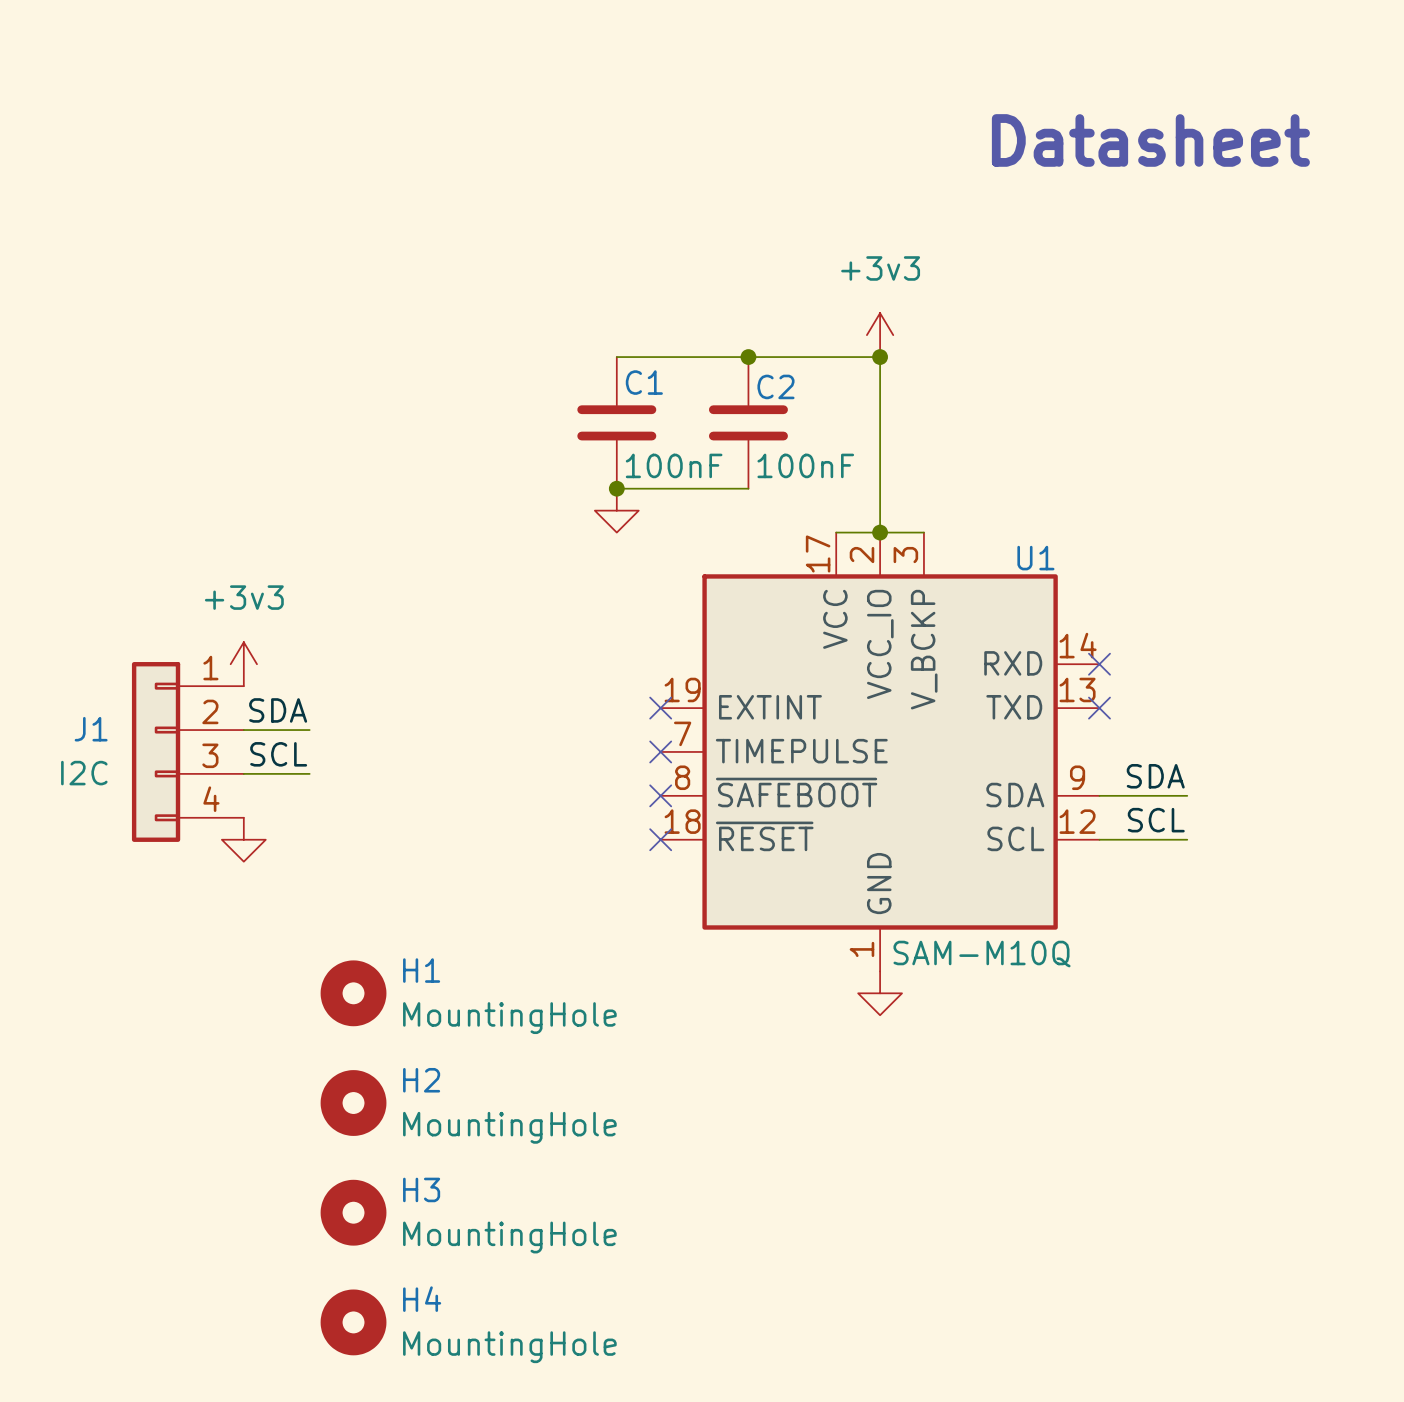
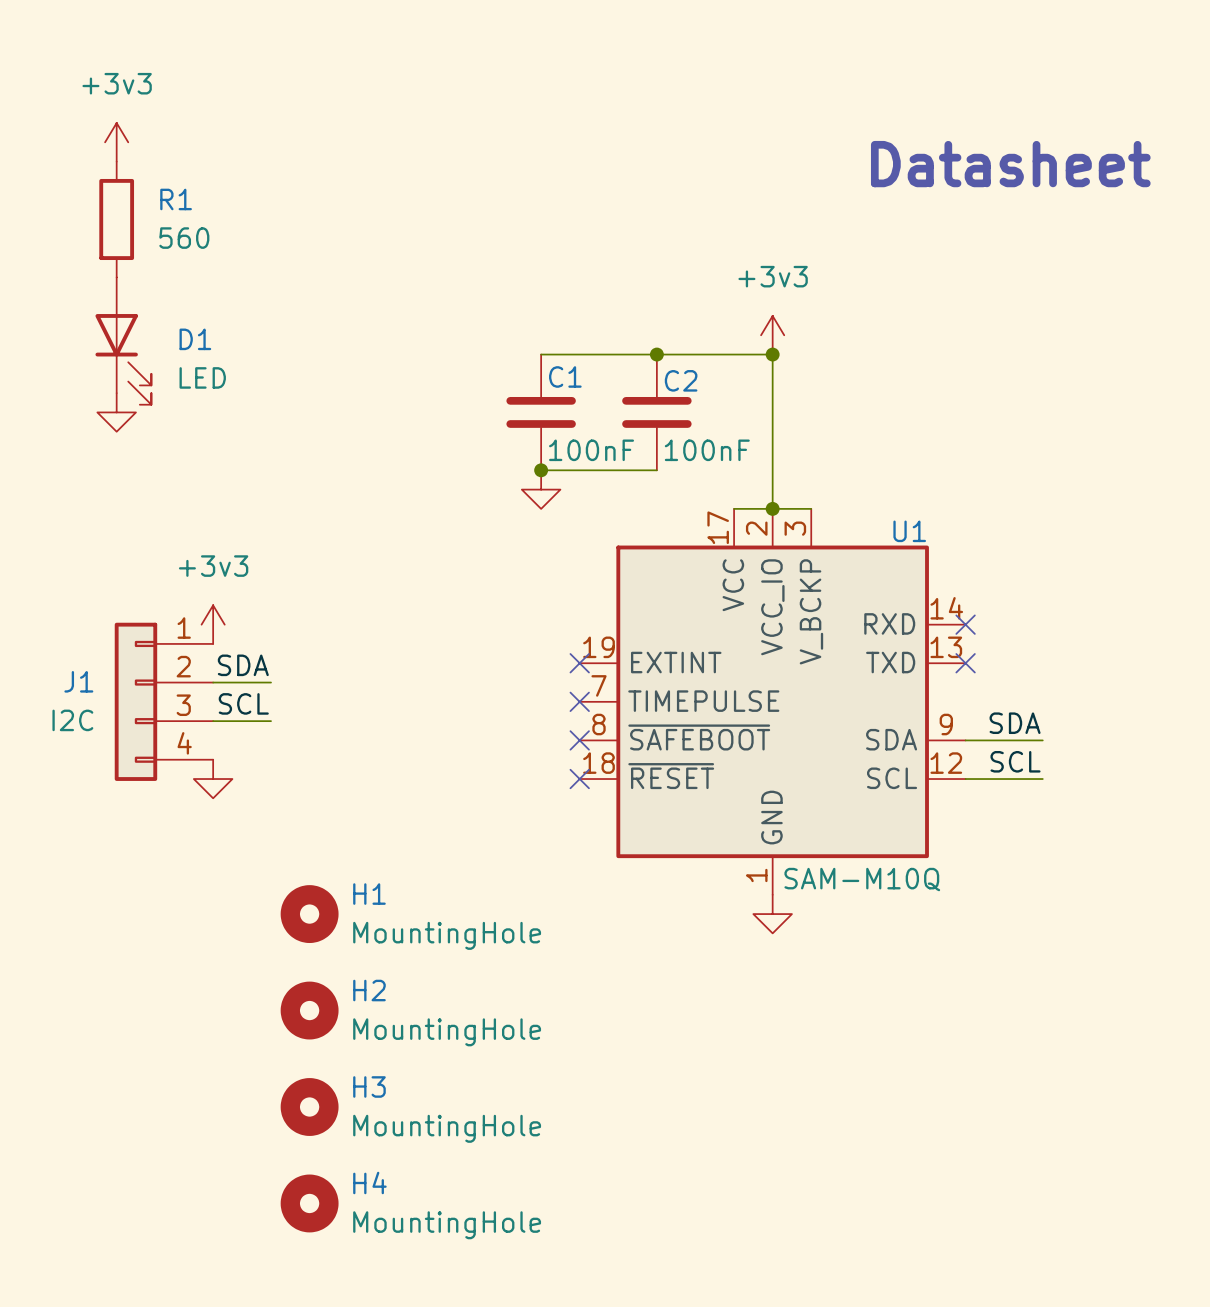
power symbol: none -> +3v3 (116, 142)
R1: none -> 560 (116, 219)
D1: none -> LED (123, 341)
power symbol: none -> (116, 412)

